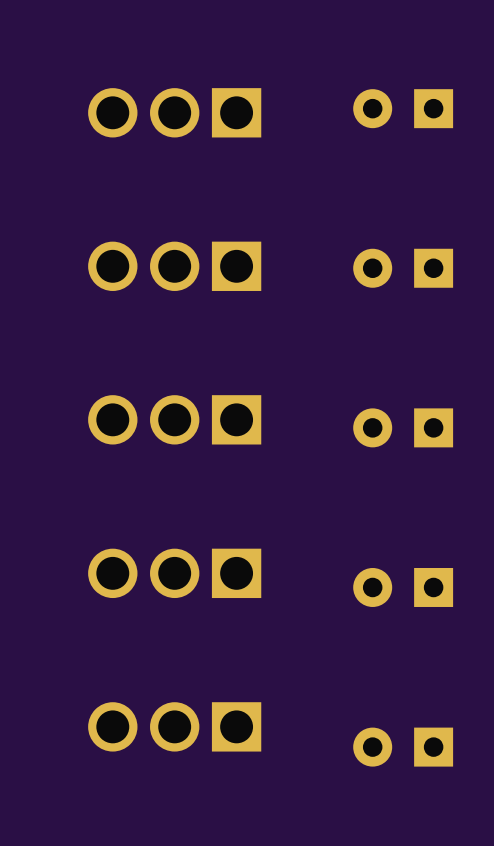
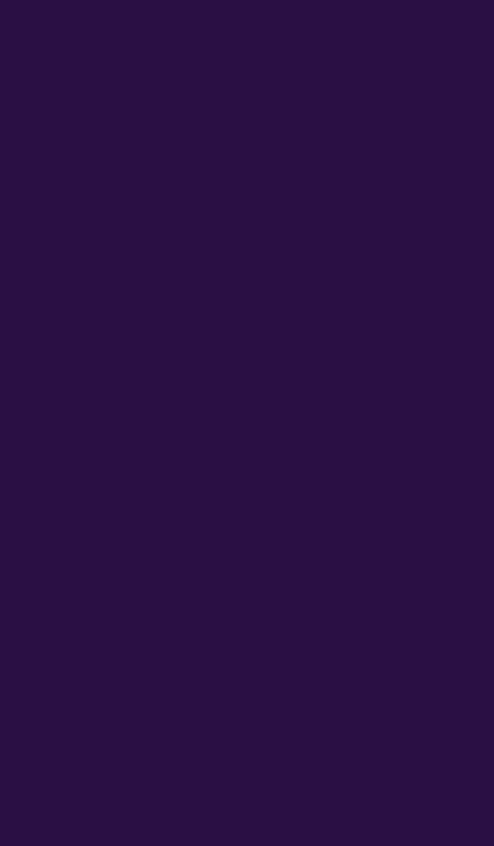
part: (403, 108) -> none
part: (174, 112) -> none
part: (174, 266) -> none
part: (403, 268) -> none
part: (174, 419) -> none
part: (403, 427) -> none
part: (174, 573) -> none
part: (403, 587) -> none
part: (174, 726) -> none
part: (403, 747) -> none

